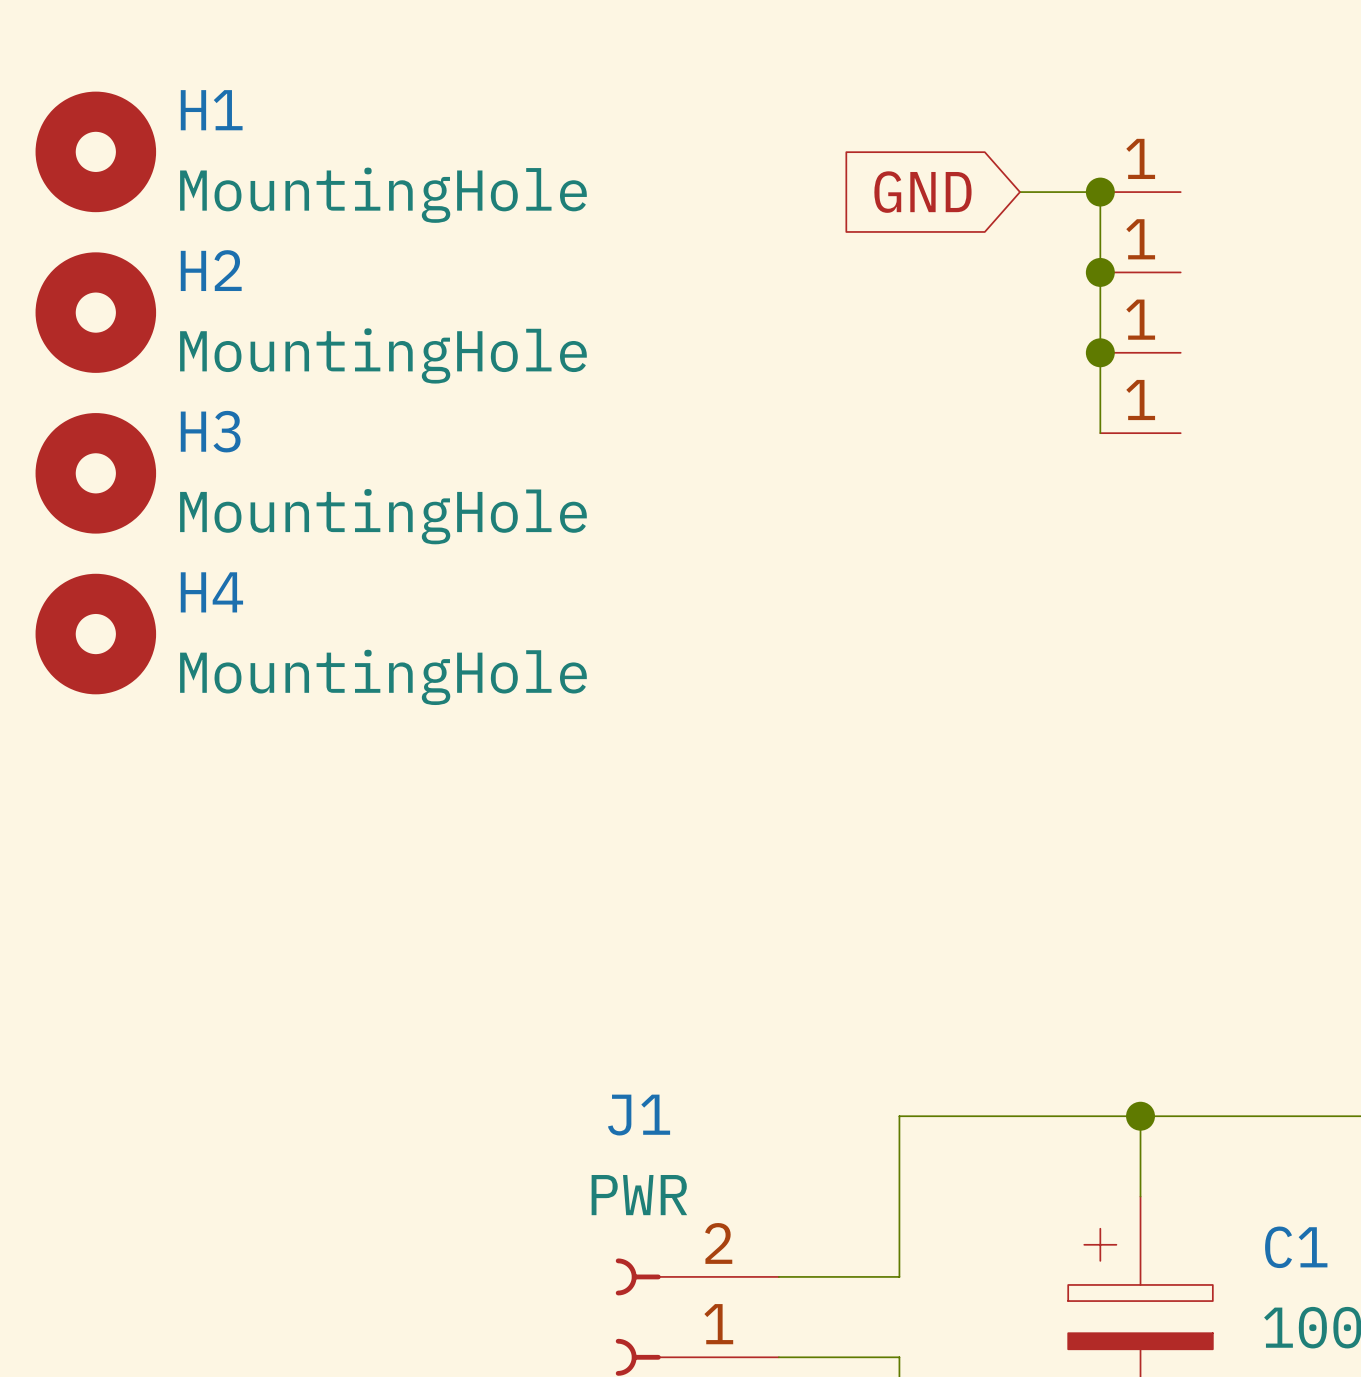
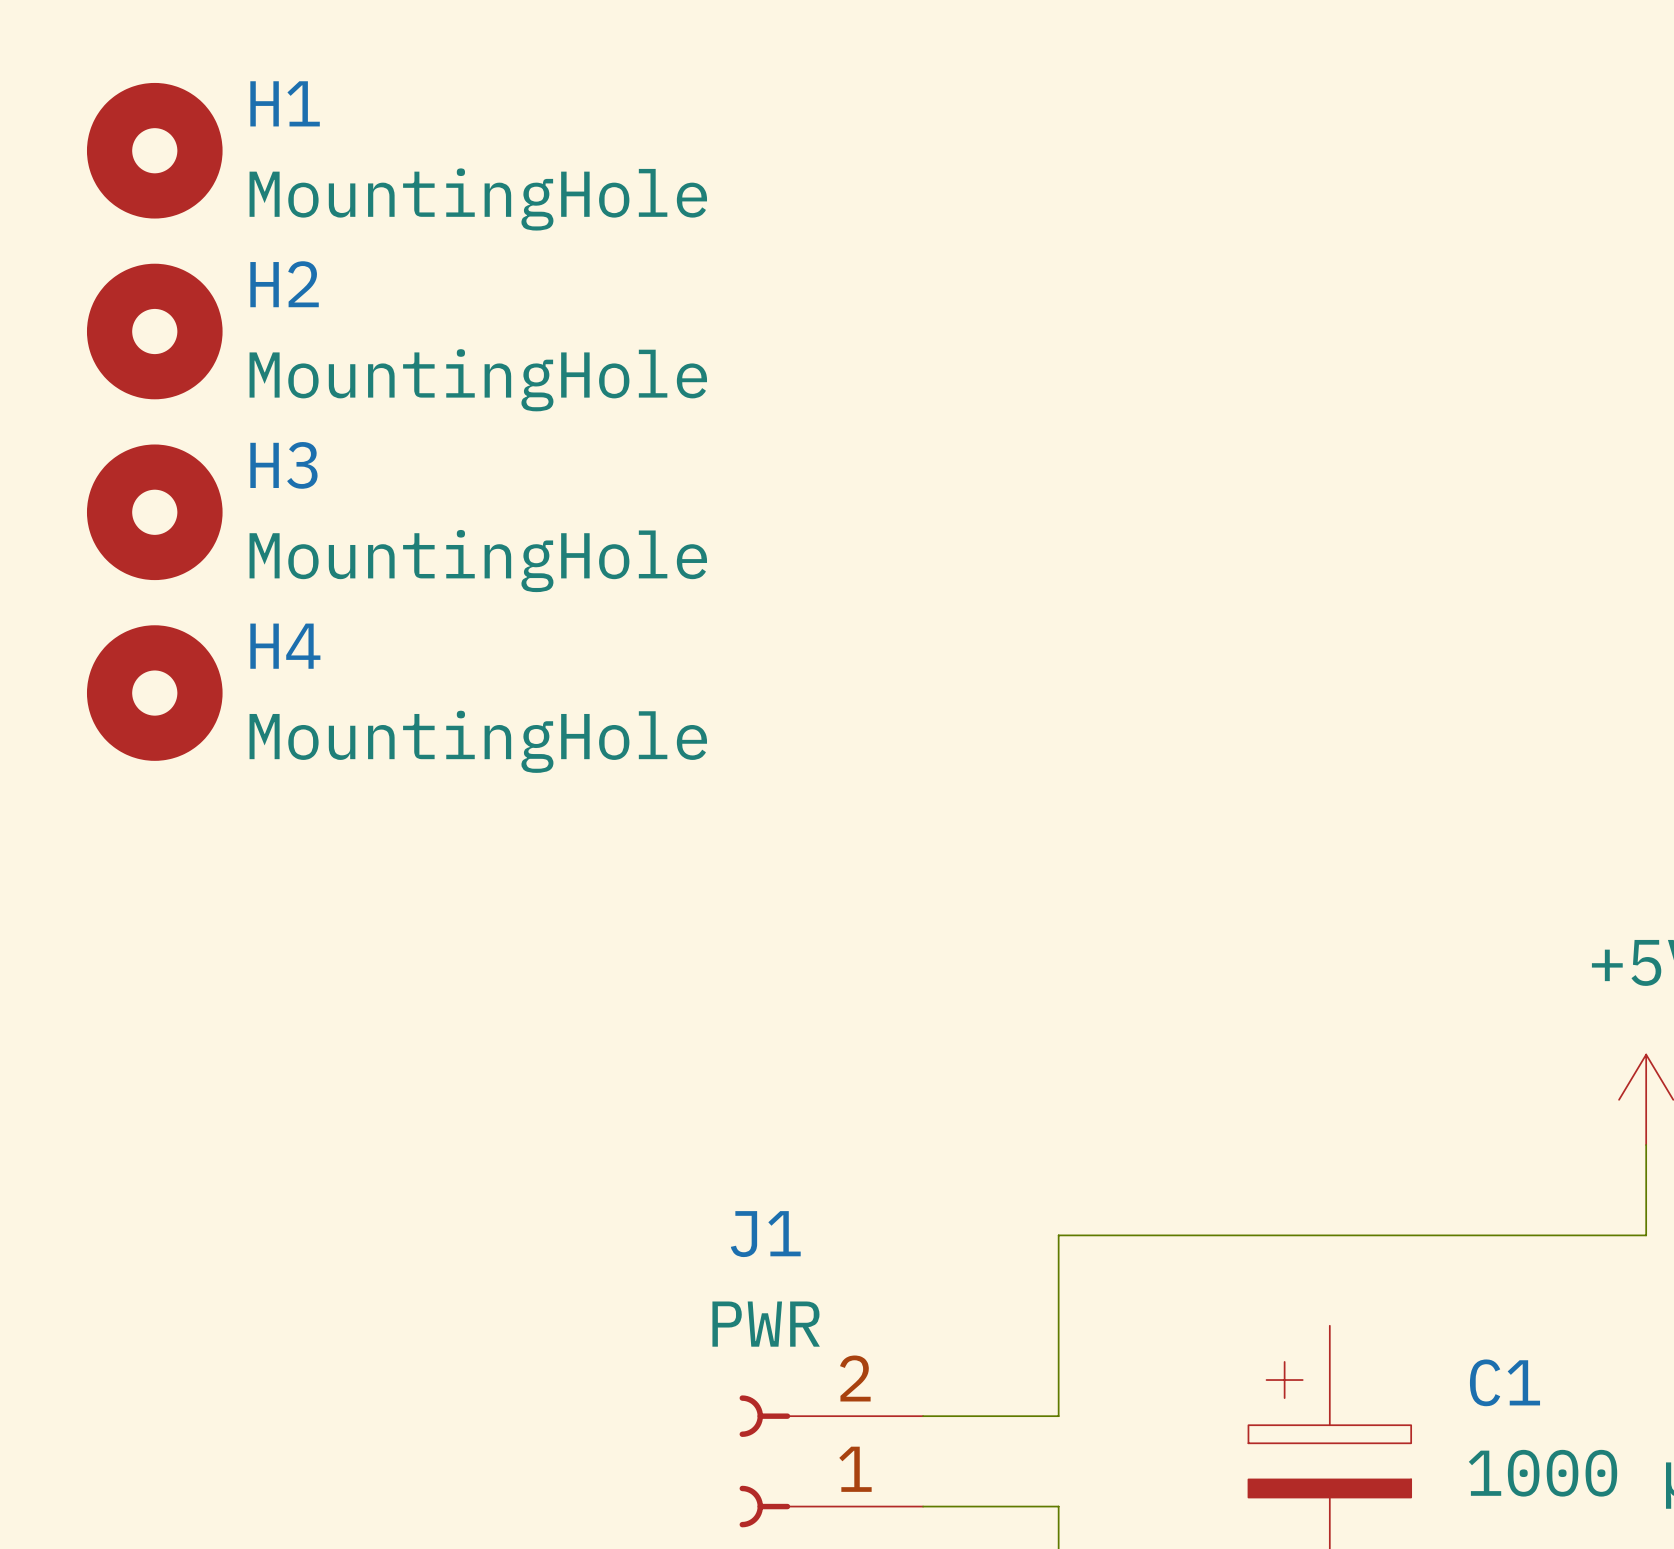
global label: GND (922, 192) -> none
wire: (1019, 192) (1100, 192) (1100, 433) -> none
junction: (1100, 192) -> none
part: (1140, 192) -> none
junction: (1100, 272) -> none
part: (1140, 272) -> none
junction: (1100, 352) -> none
part: (1140, 352) -> none
part: (1140, 433) -> none
wire: (1140, 1116) (1140, 1196) -> none
junction: (1140, 1116) -> none

